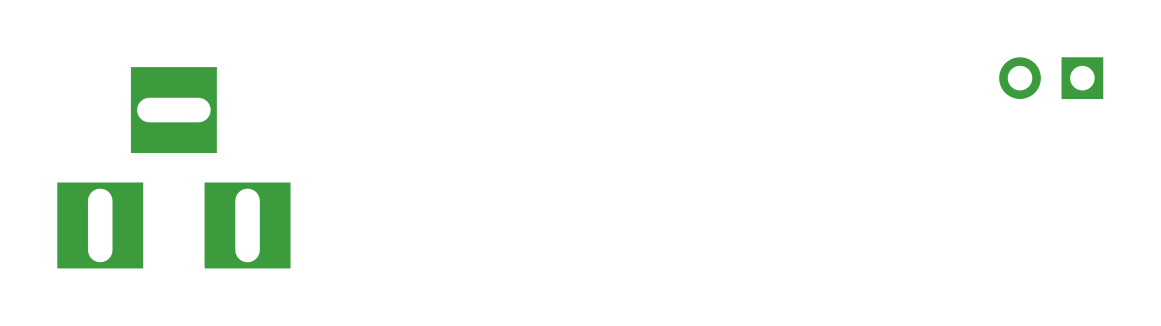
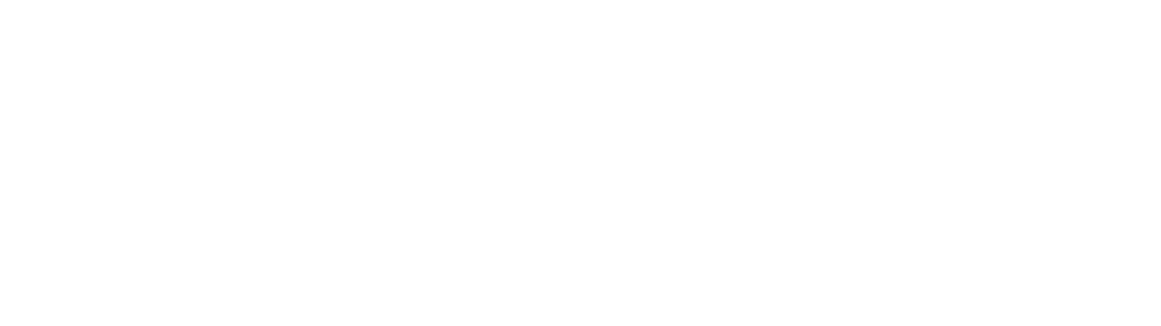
part: (1051, 78) -> none
part: (173, 167) -> none

